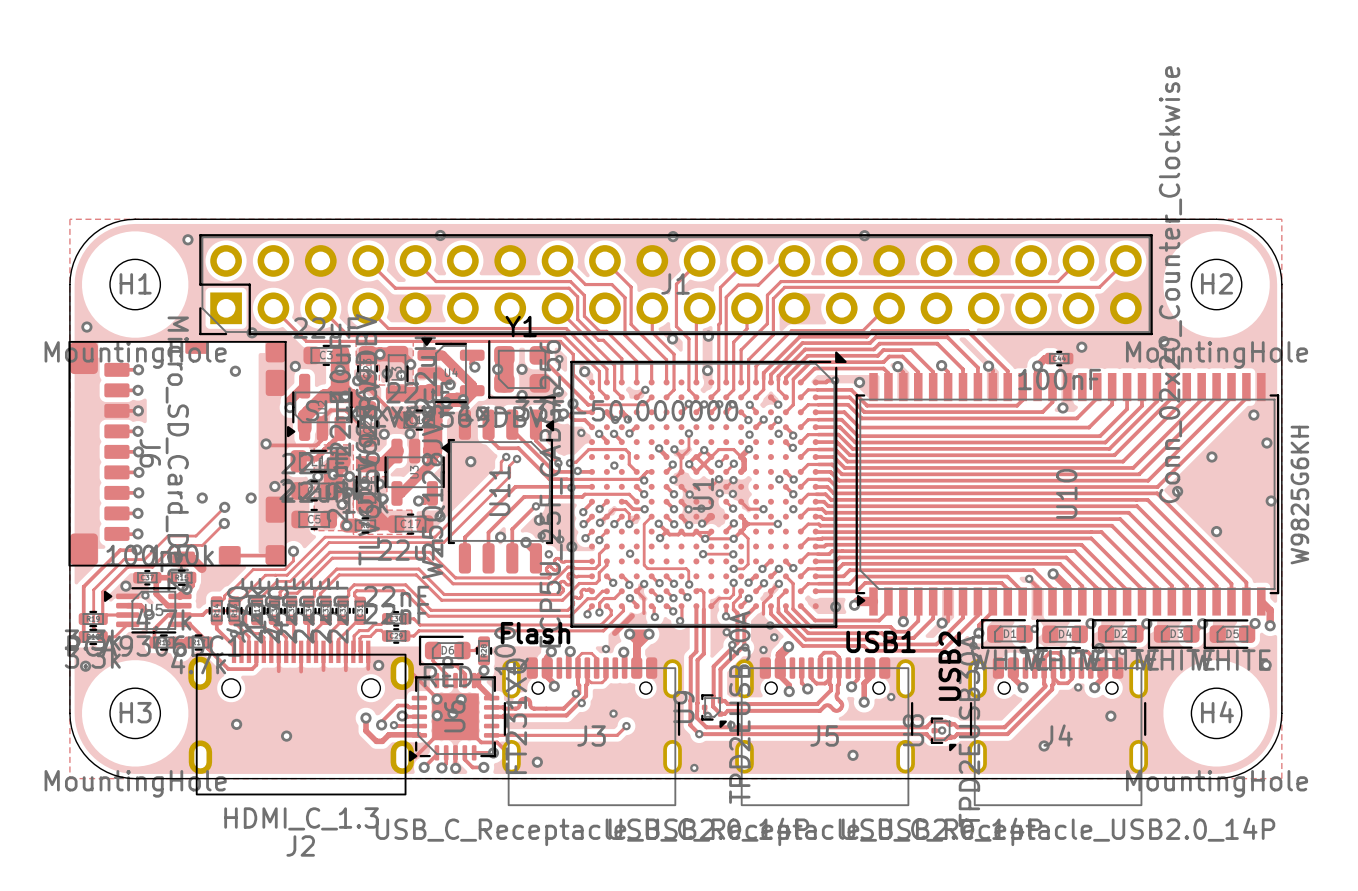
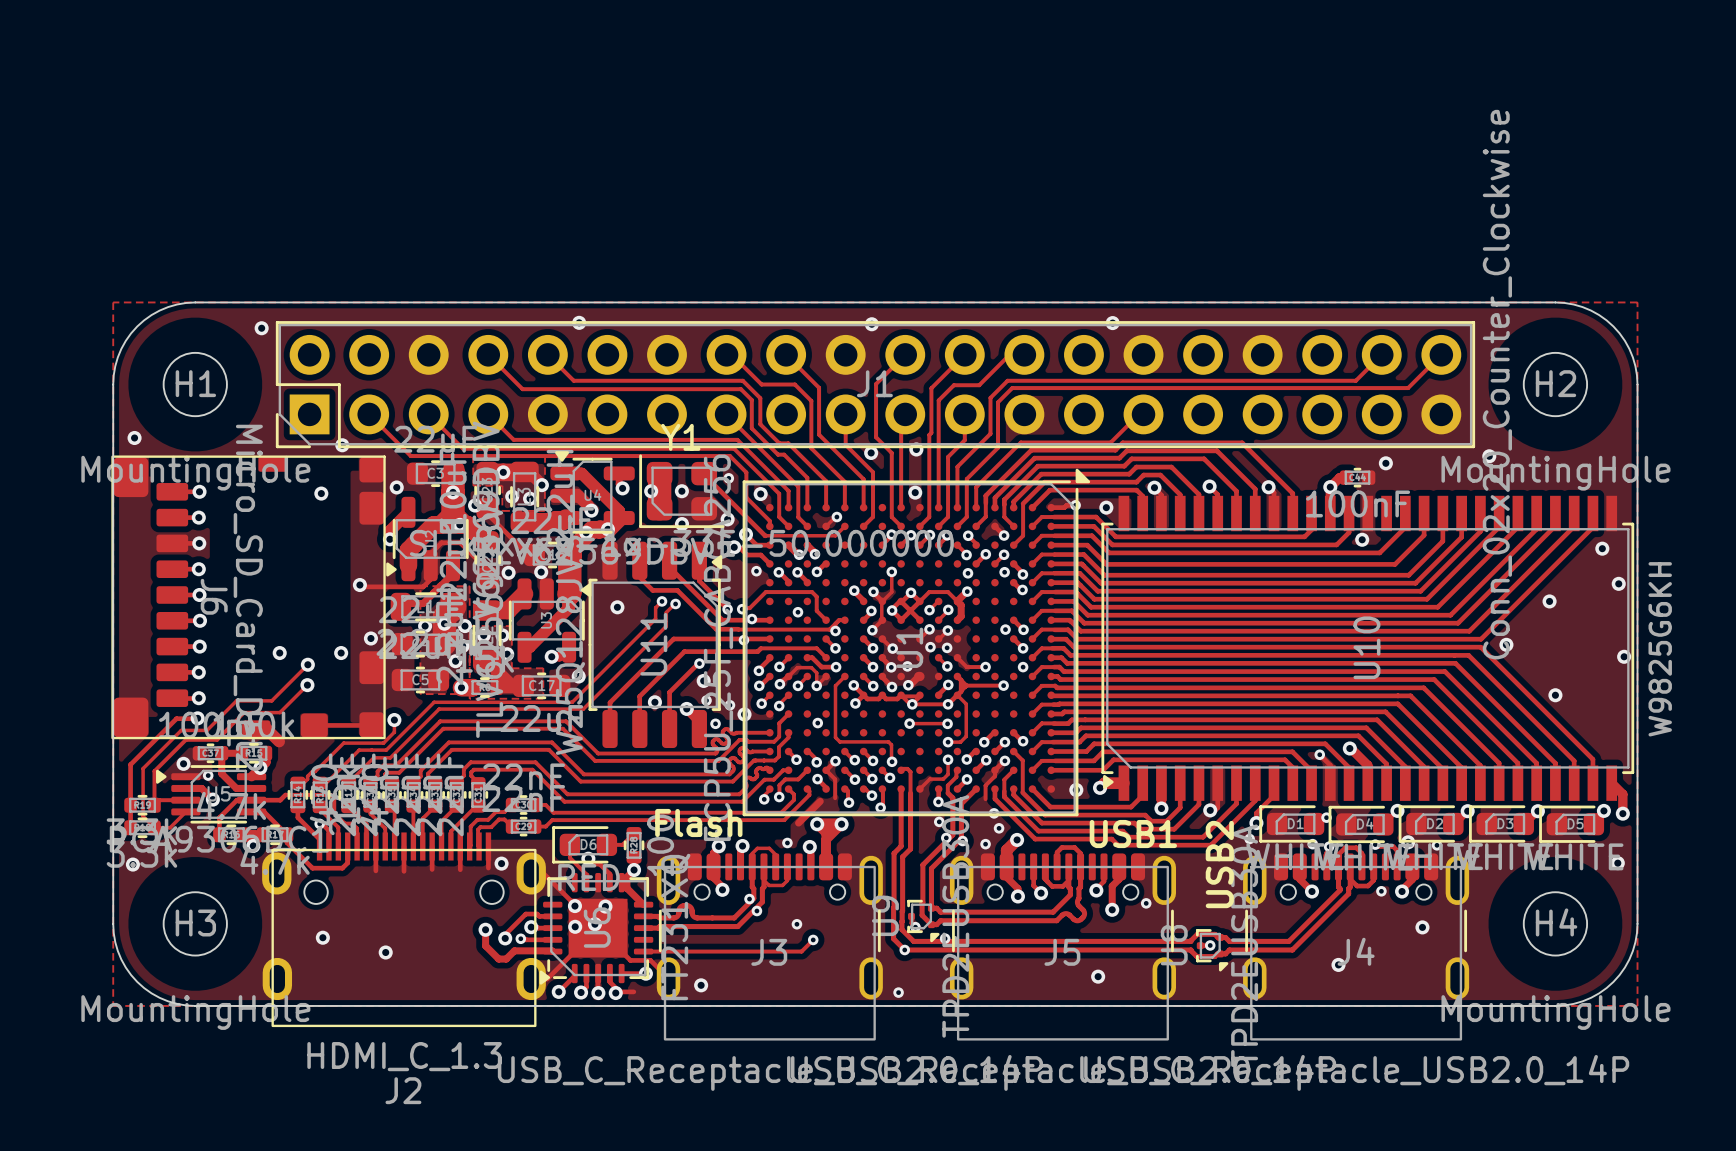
via position: (483, 767) -> (615, 993)

